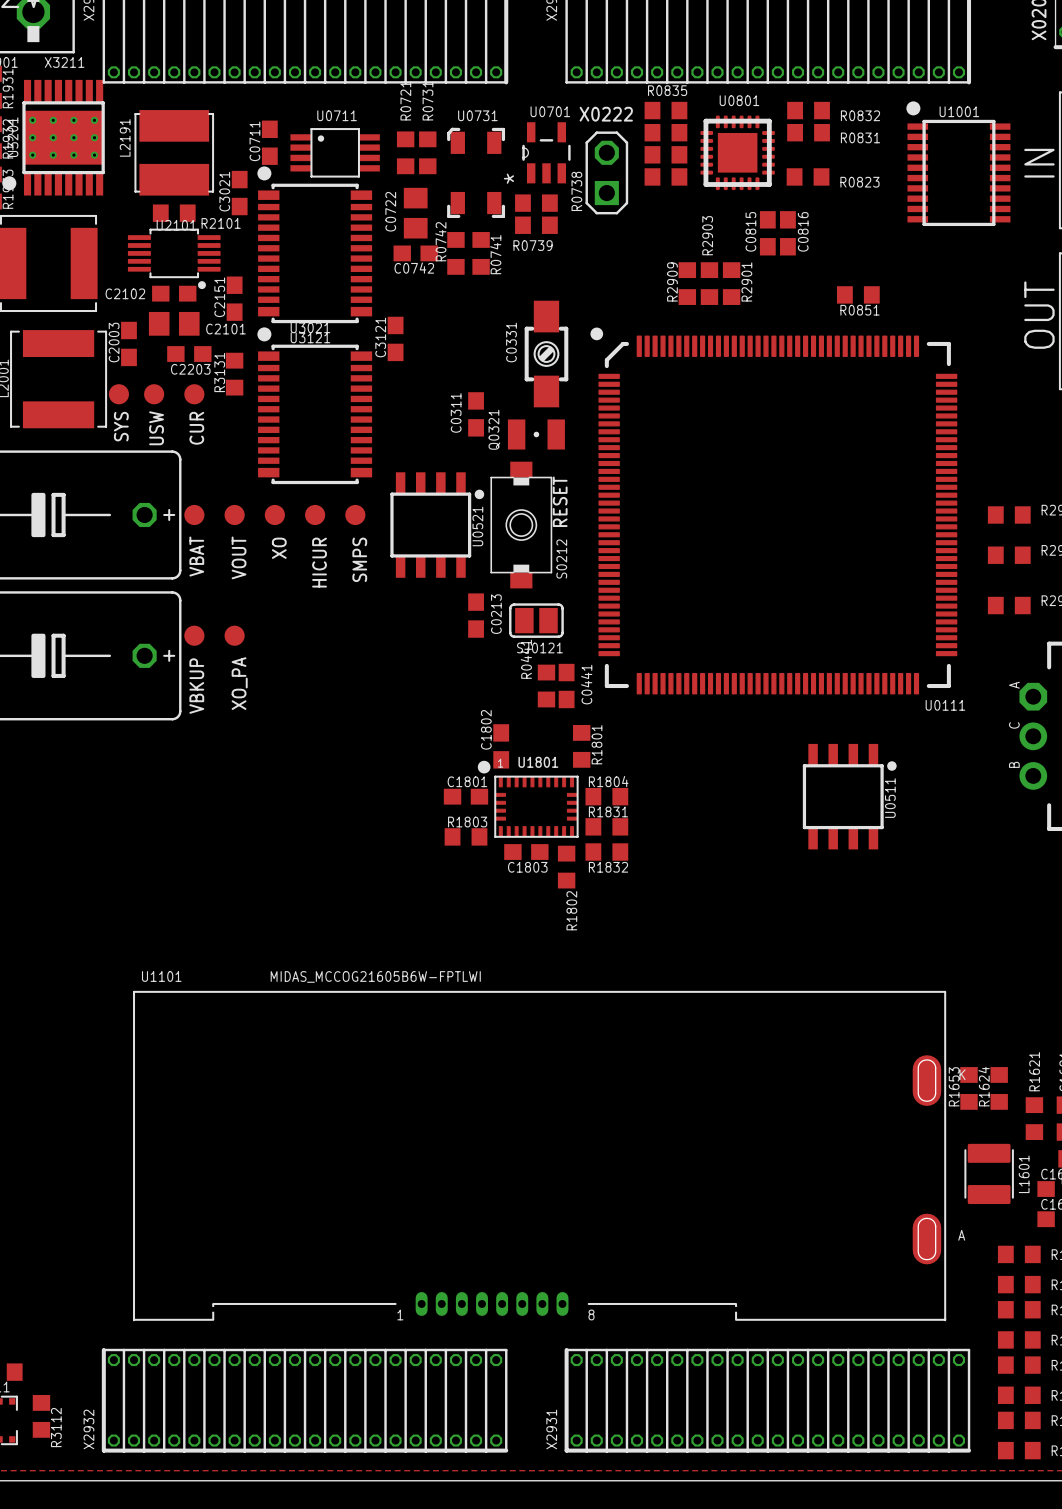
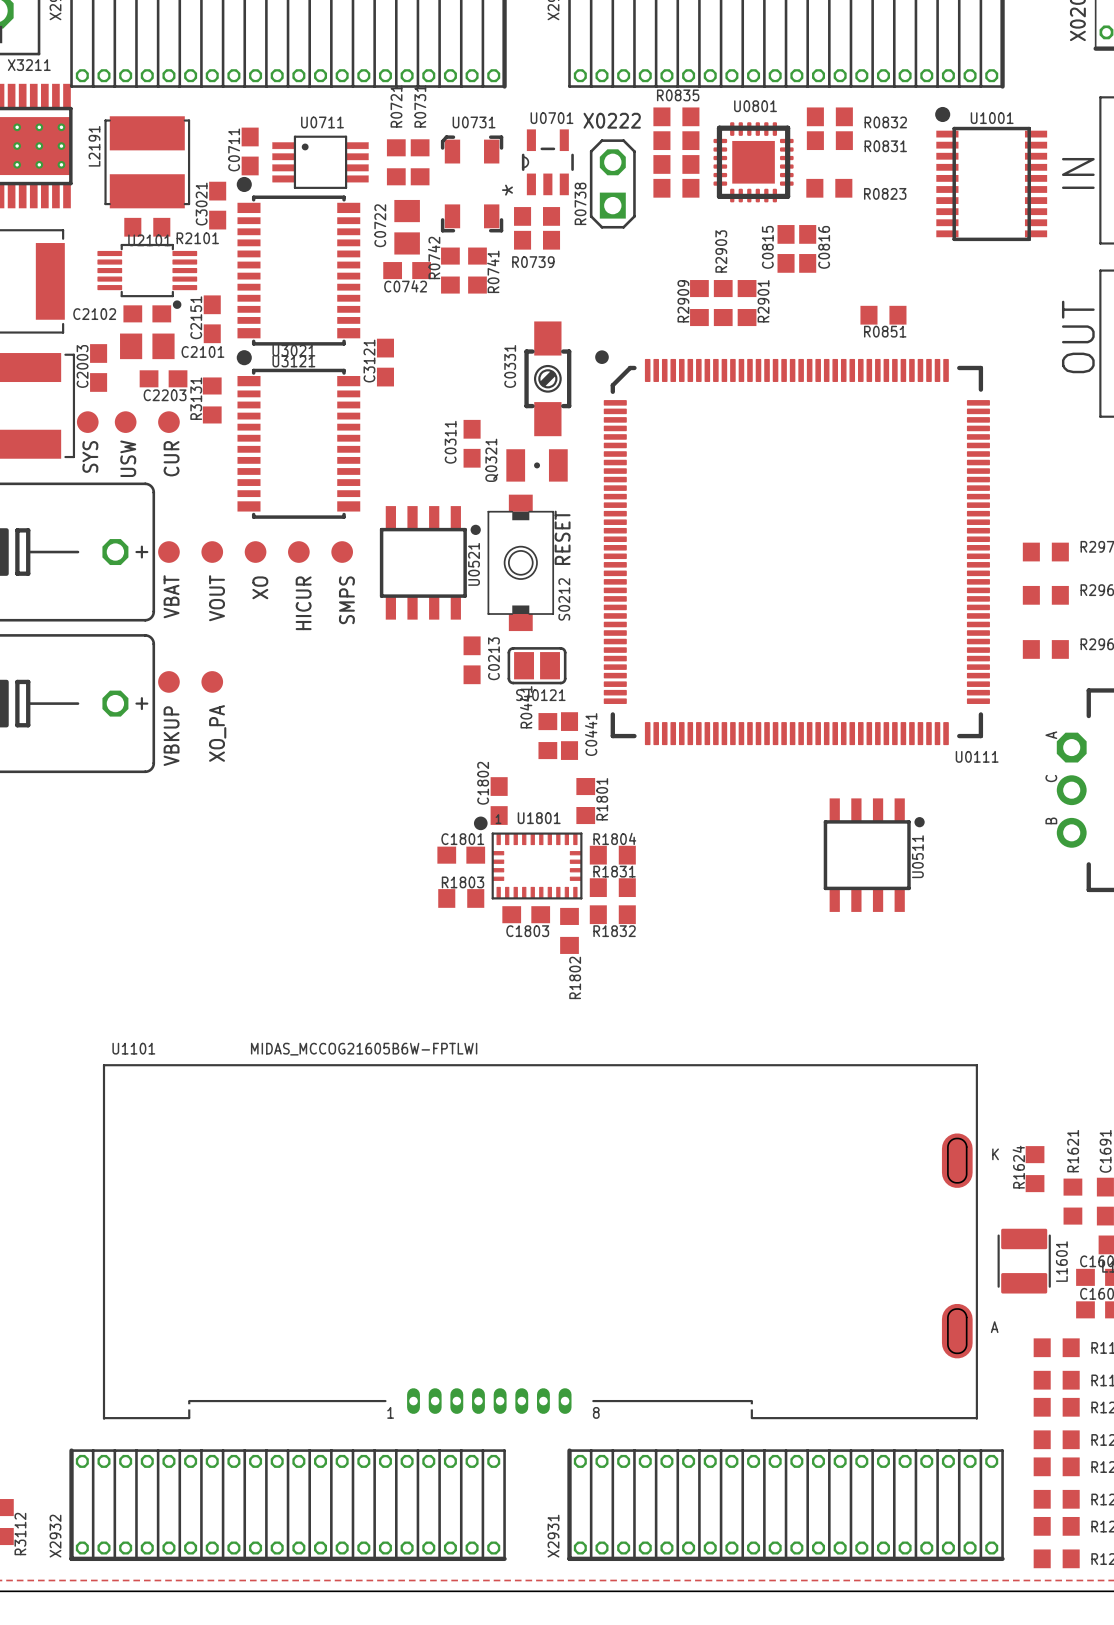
R1653: (969, 1088) -> none

